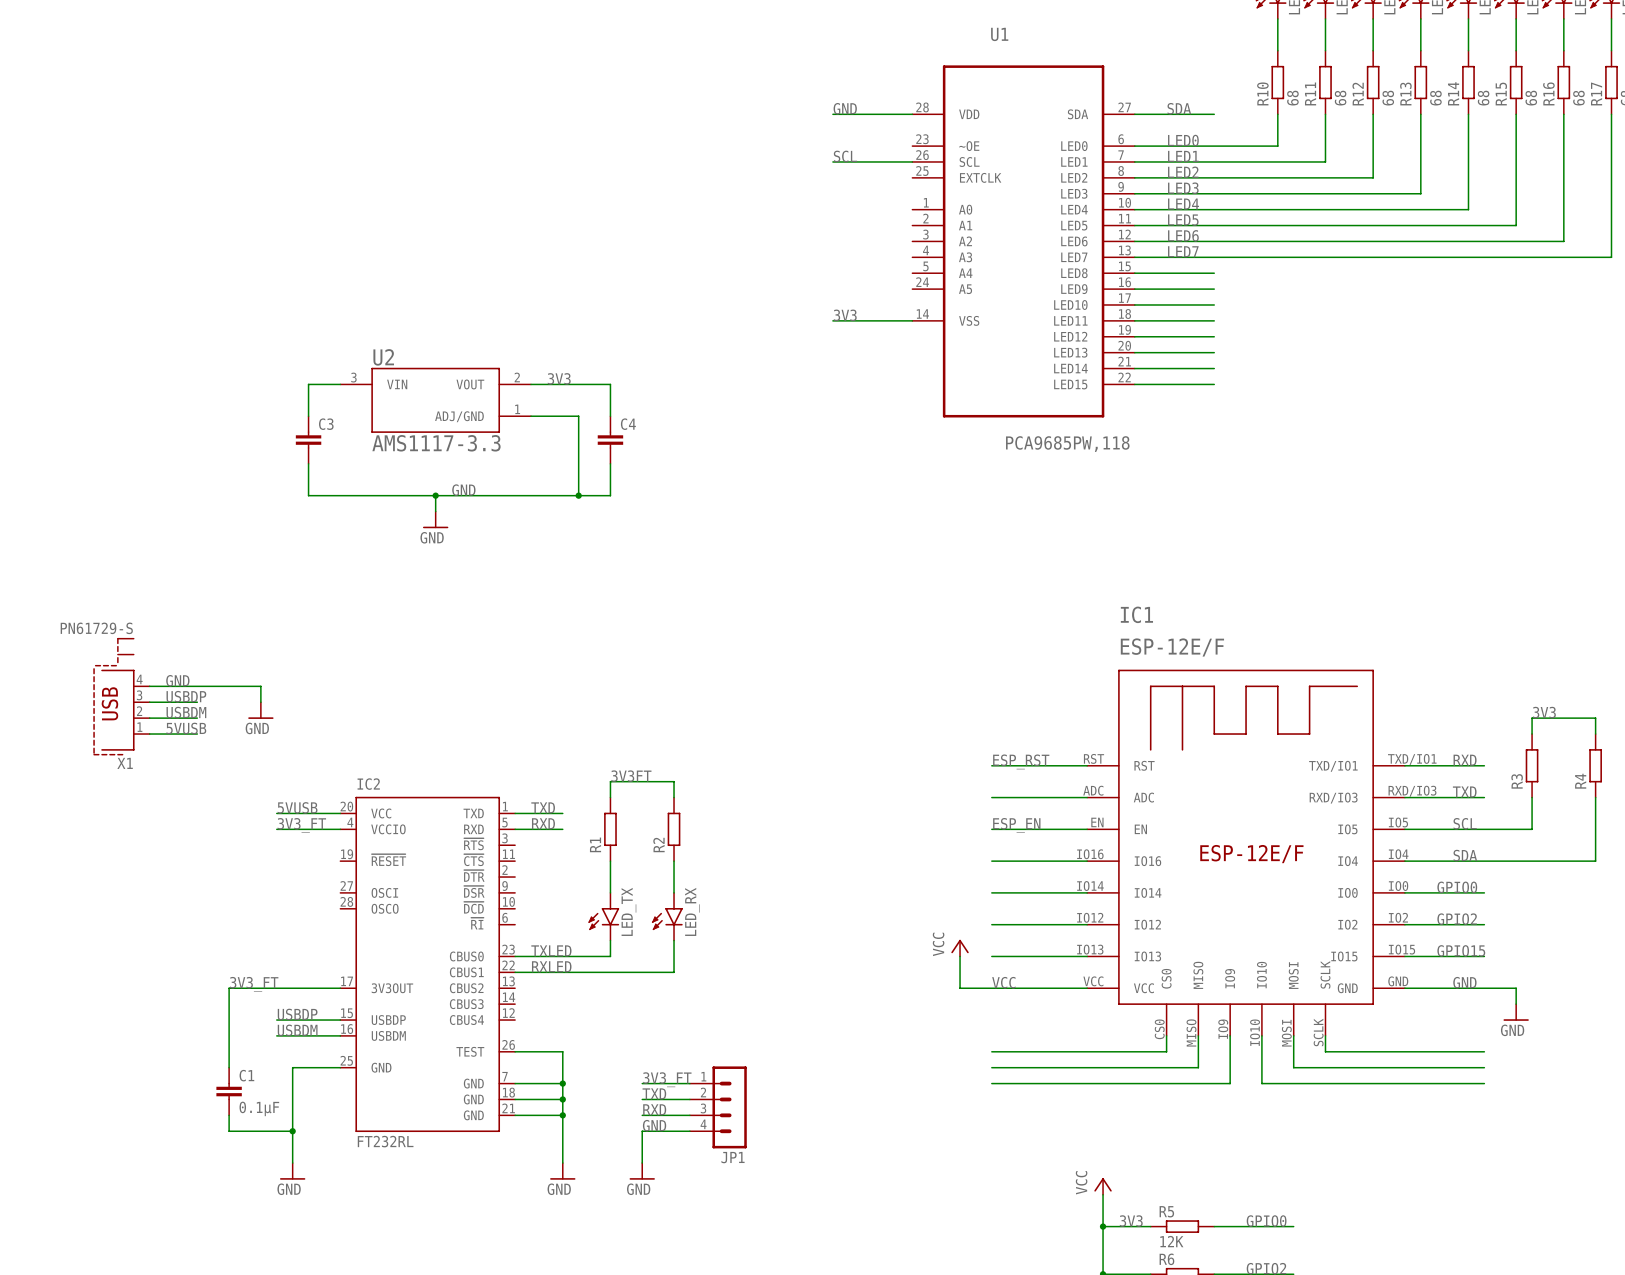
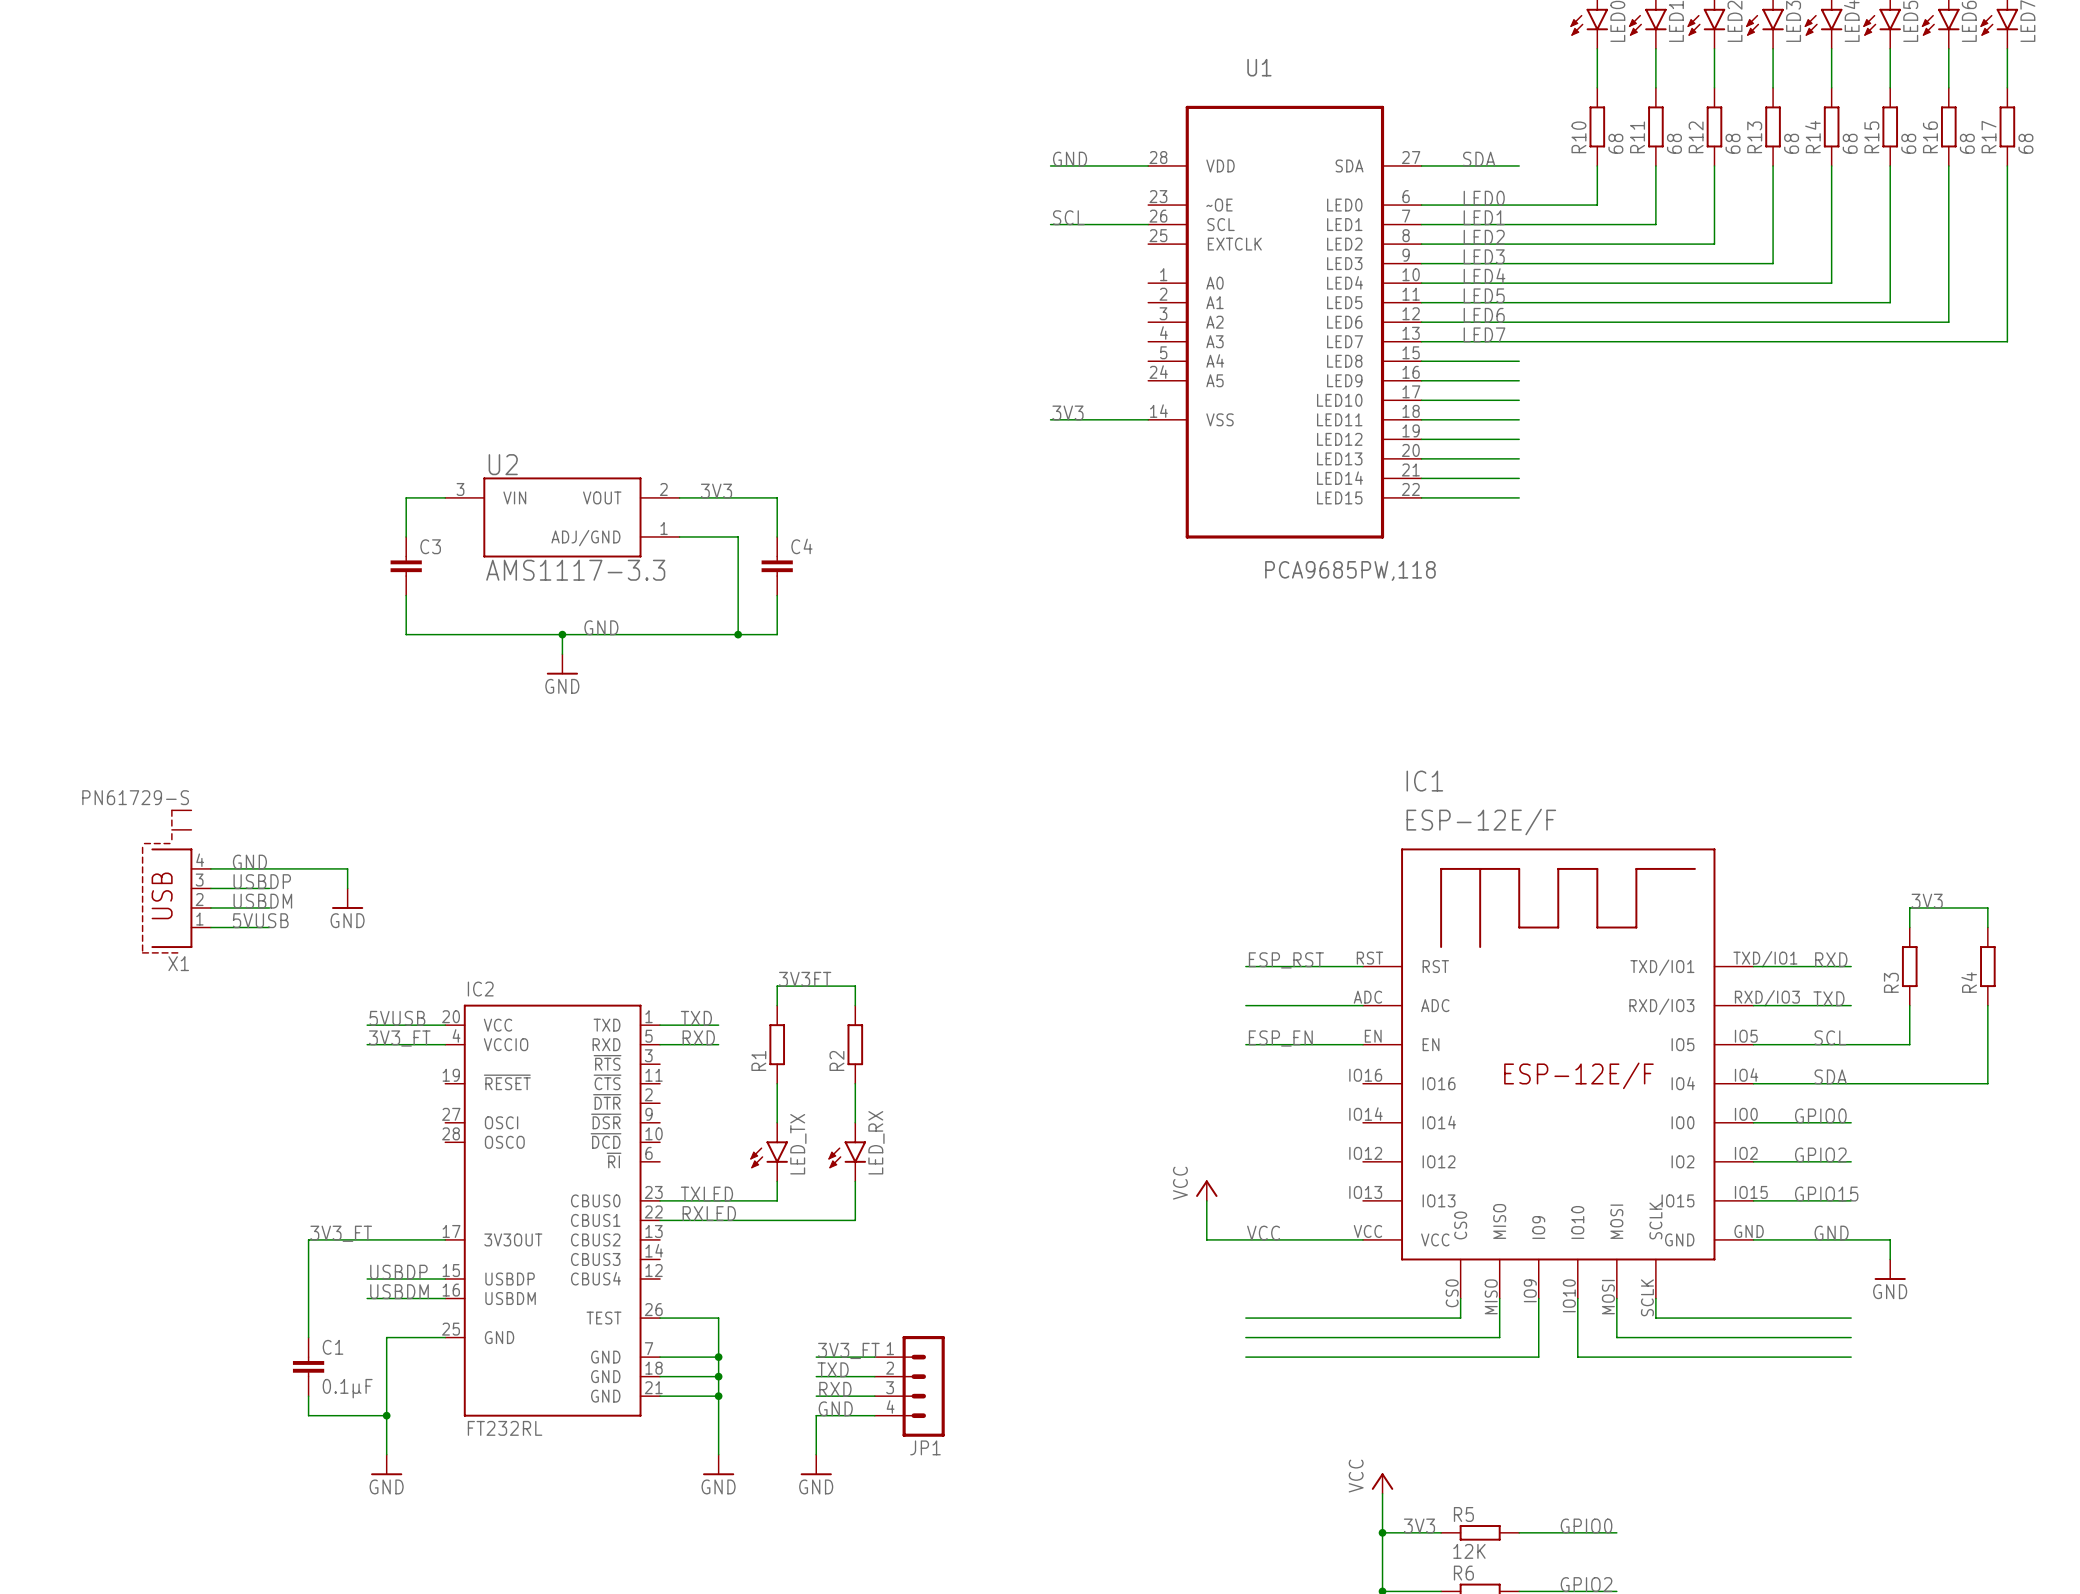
wire: (991, 861) (1087, 861) -> none
wire: (991, 892) (1087, 892) -> none
wire: (991, 924) (1087, 924) -> none
wire: (991, 956) (1087, 956) -> none

